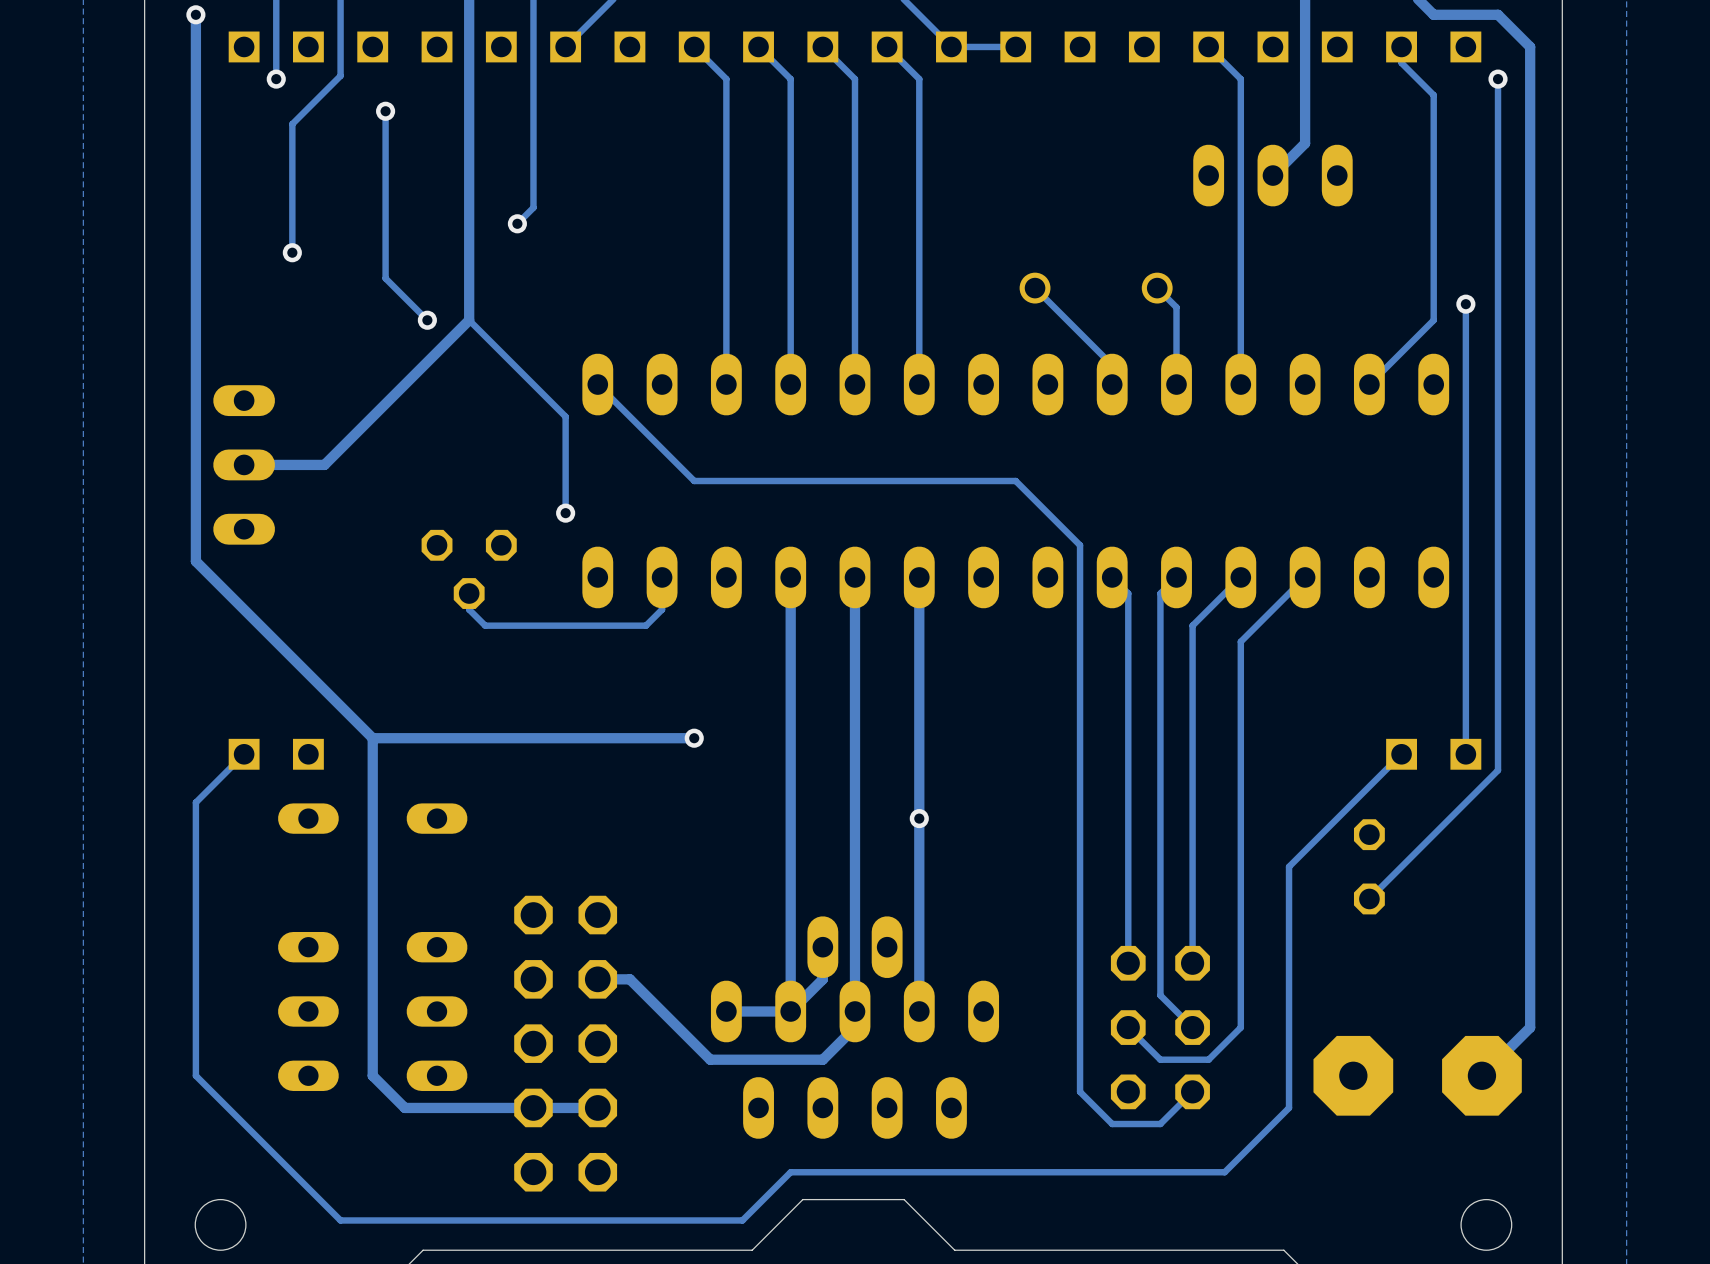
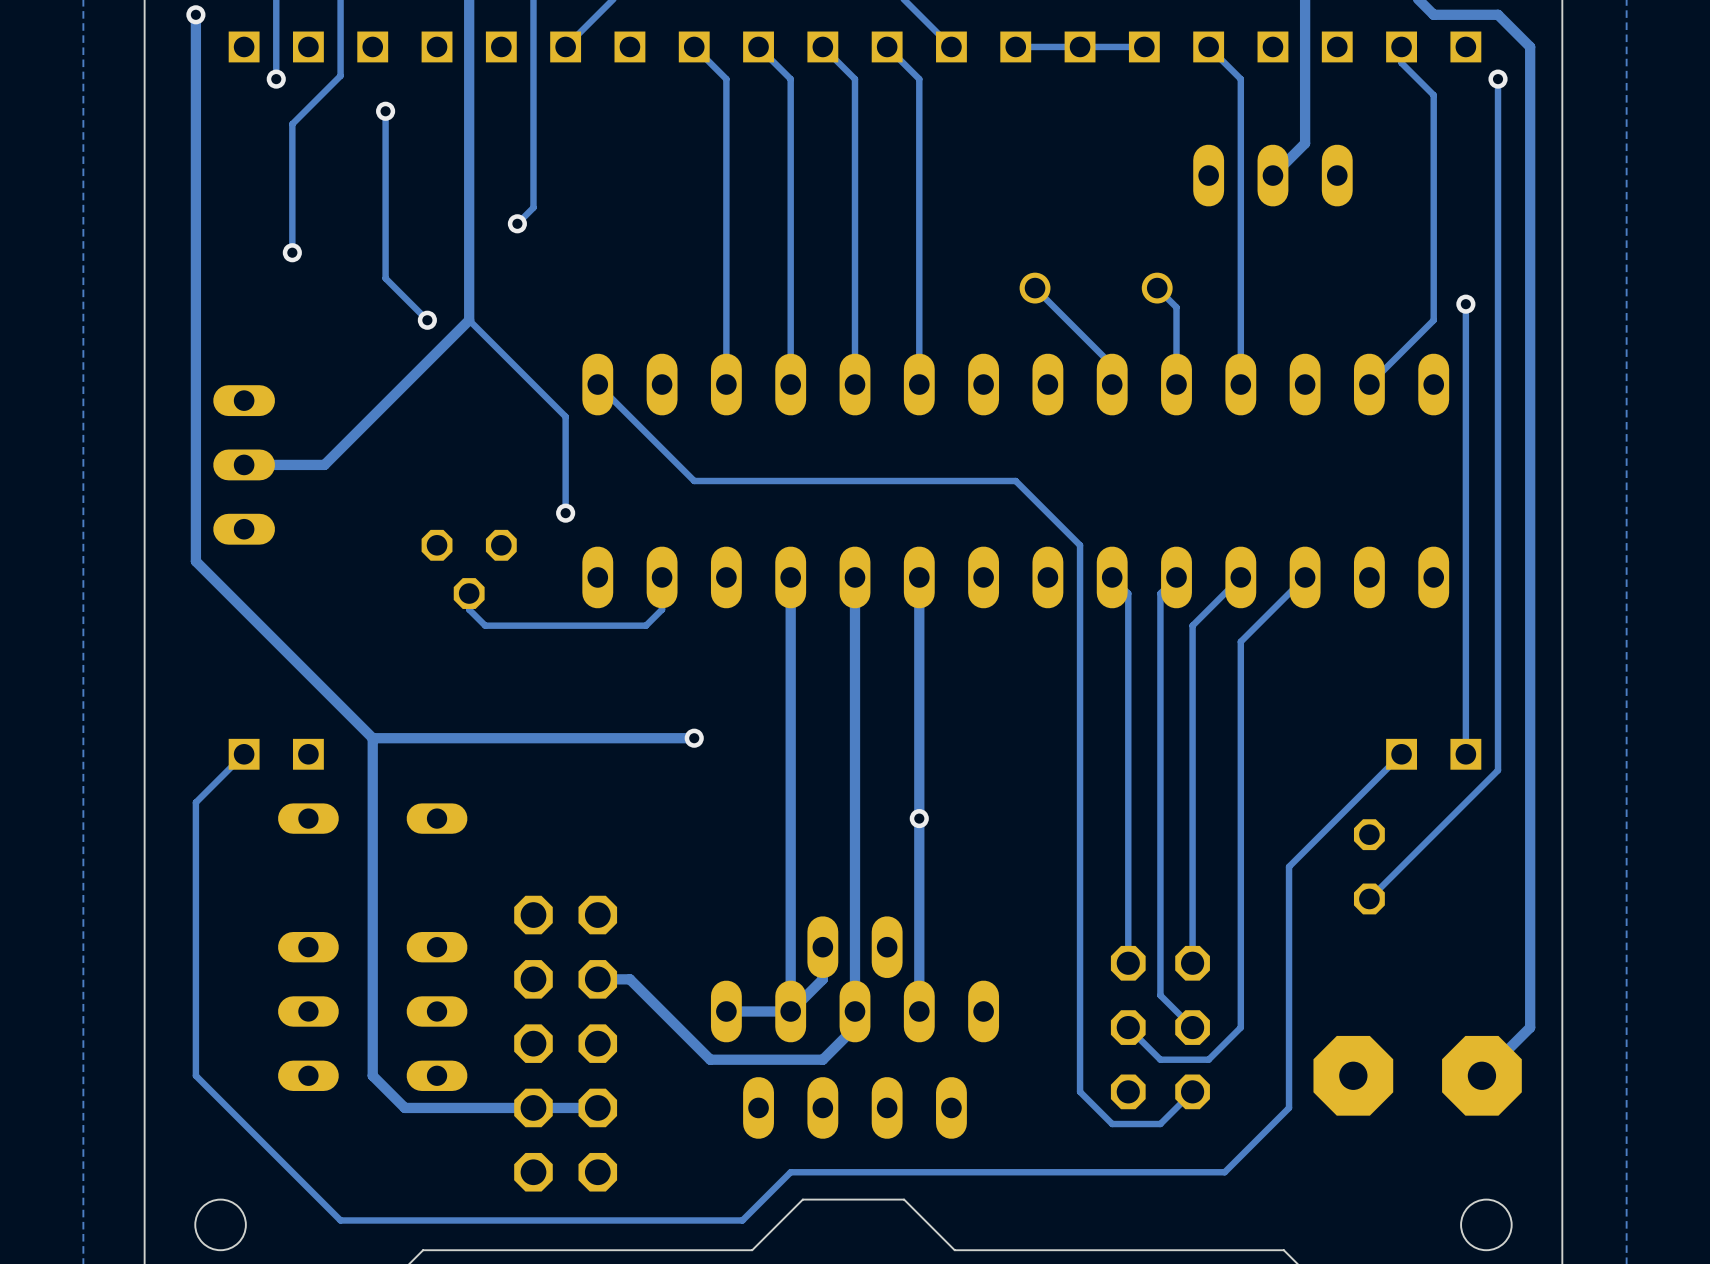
track: (1015, 46) (951, 46) -> (1015, 46) (1144, 46)

